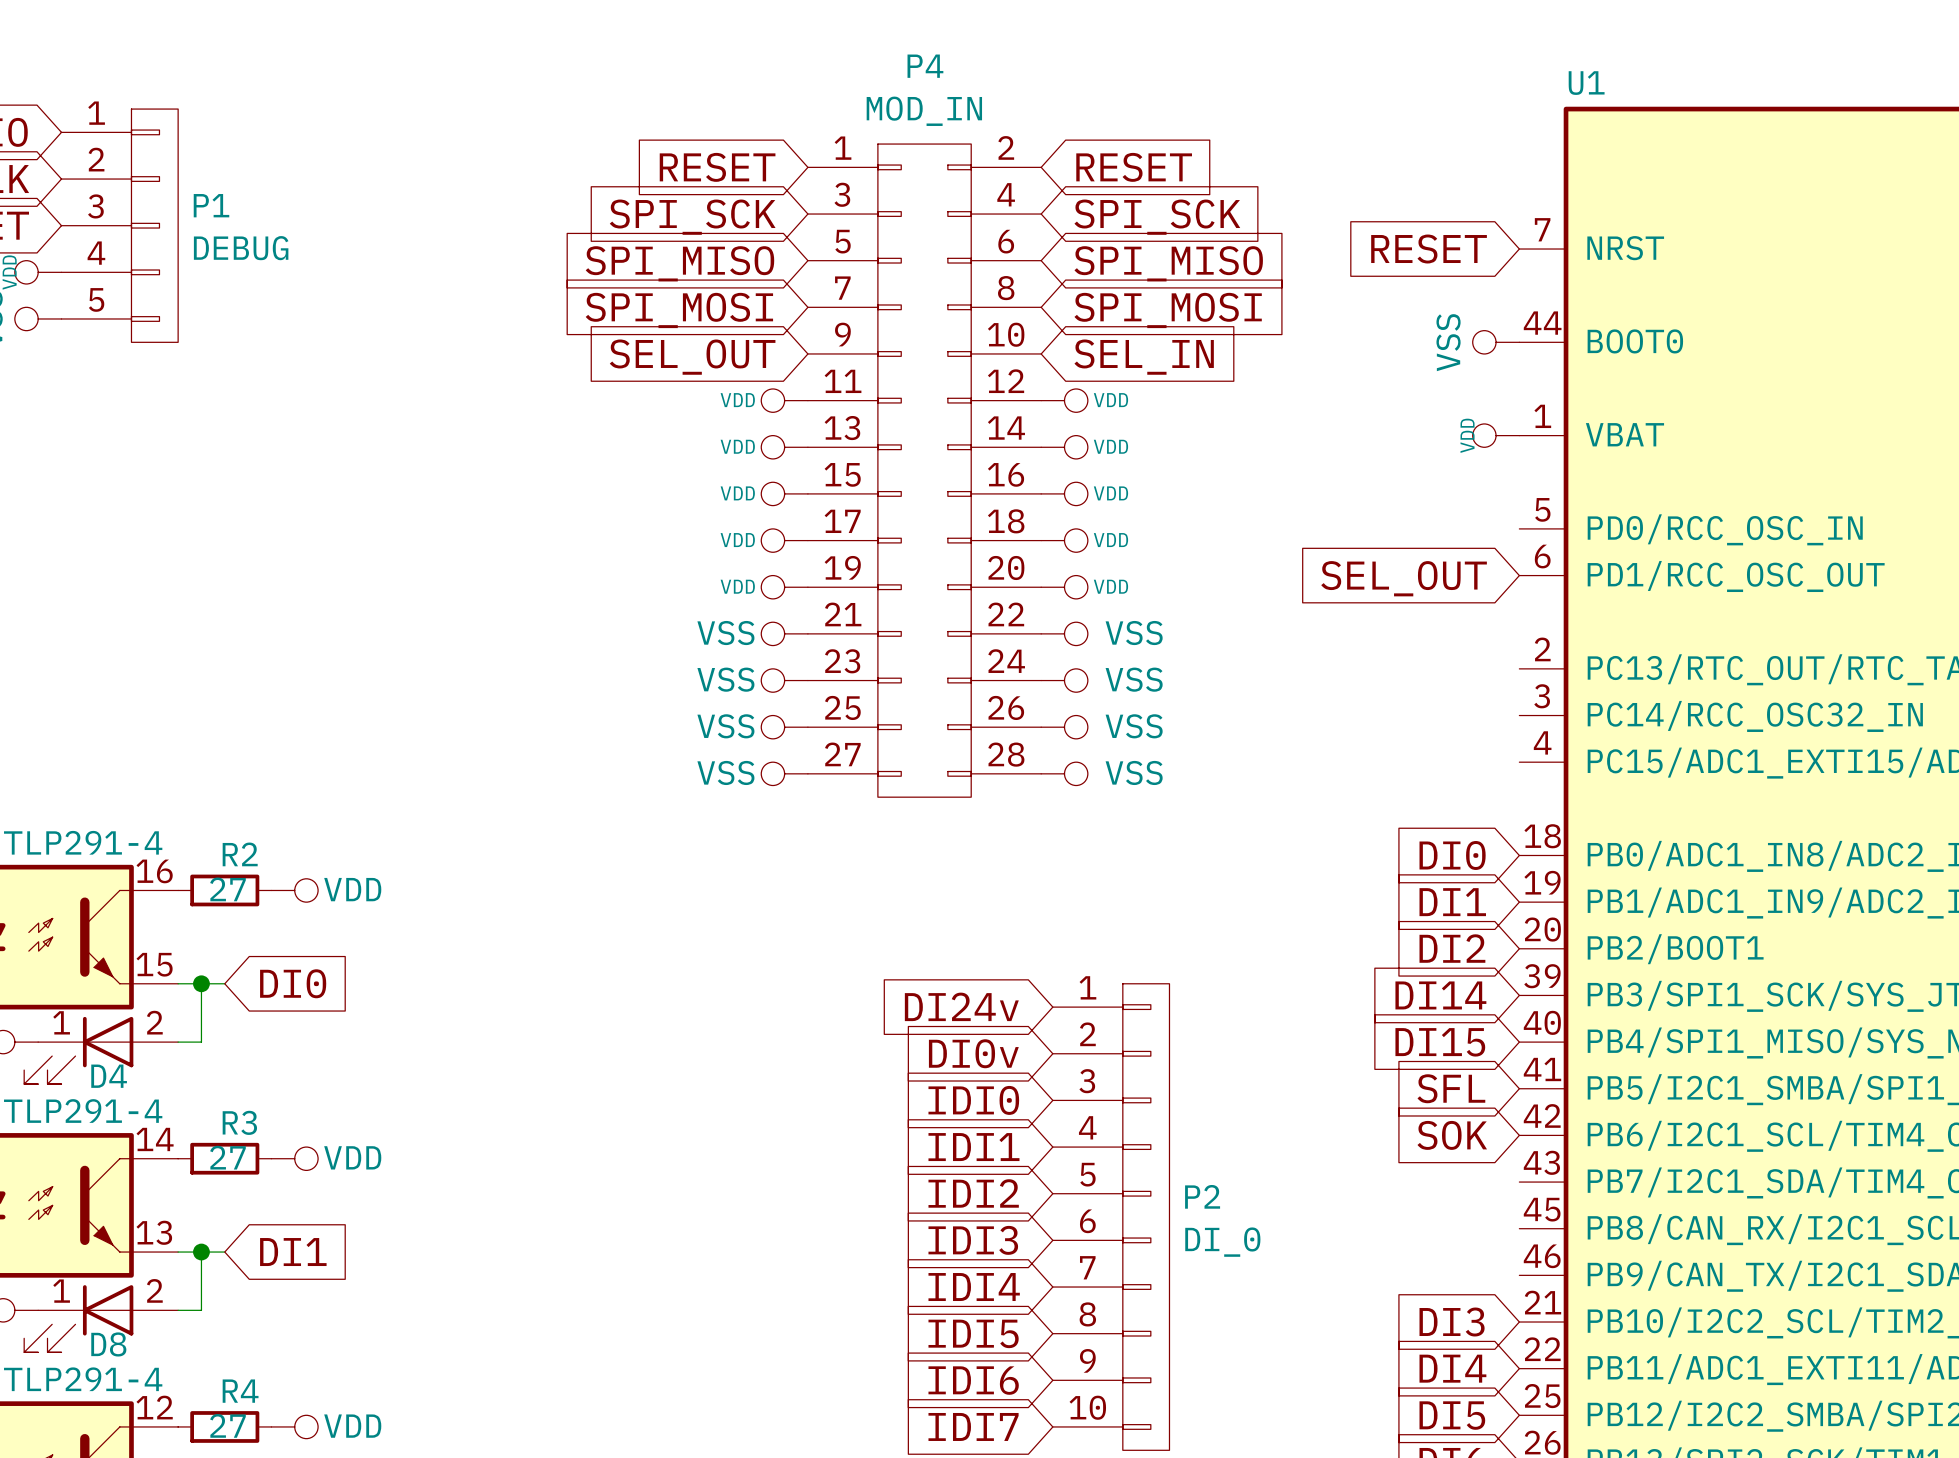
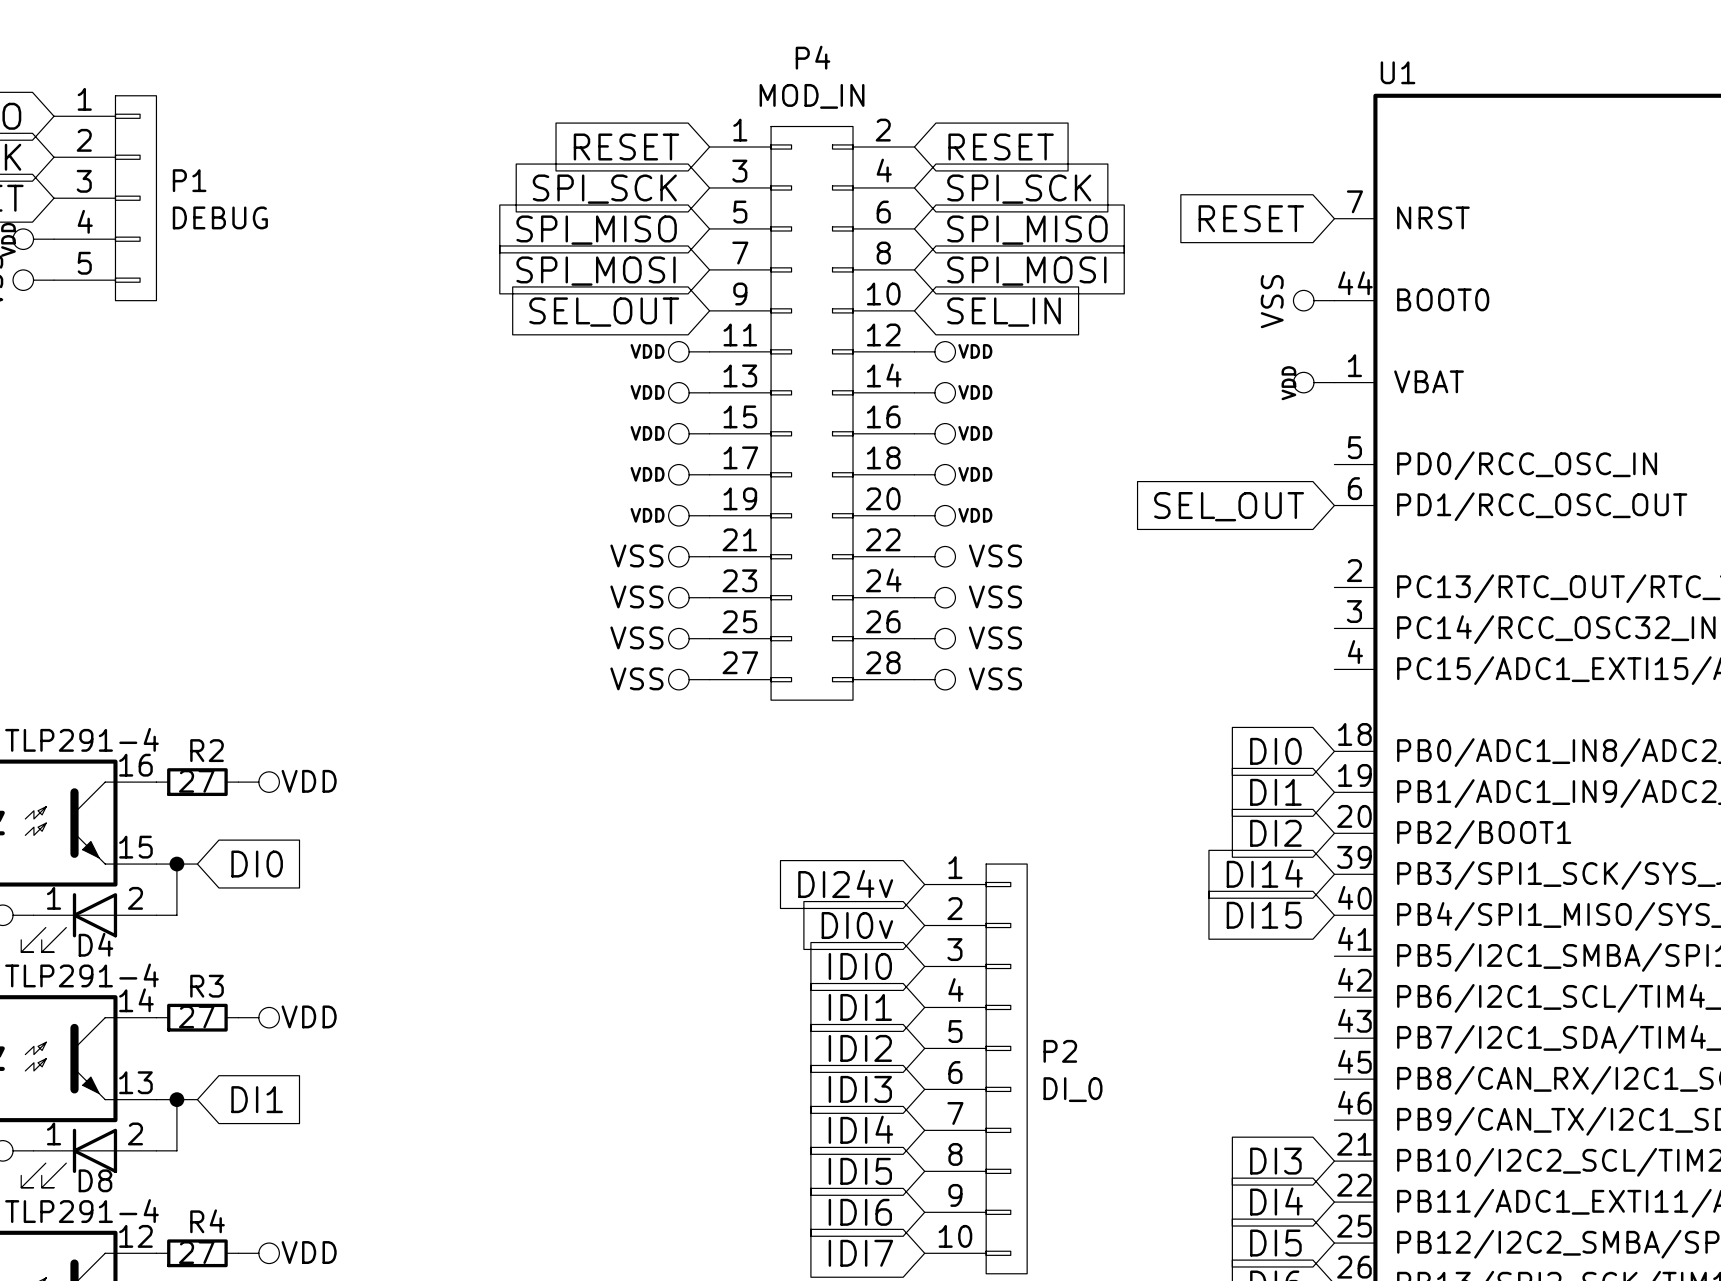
global label: SFL (1451, 1088) -> none
global label: SOK (1452, 1135) -> none

